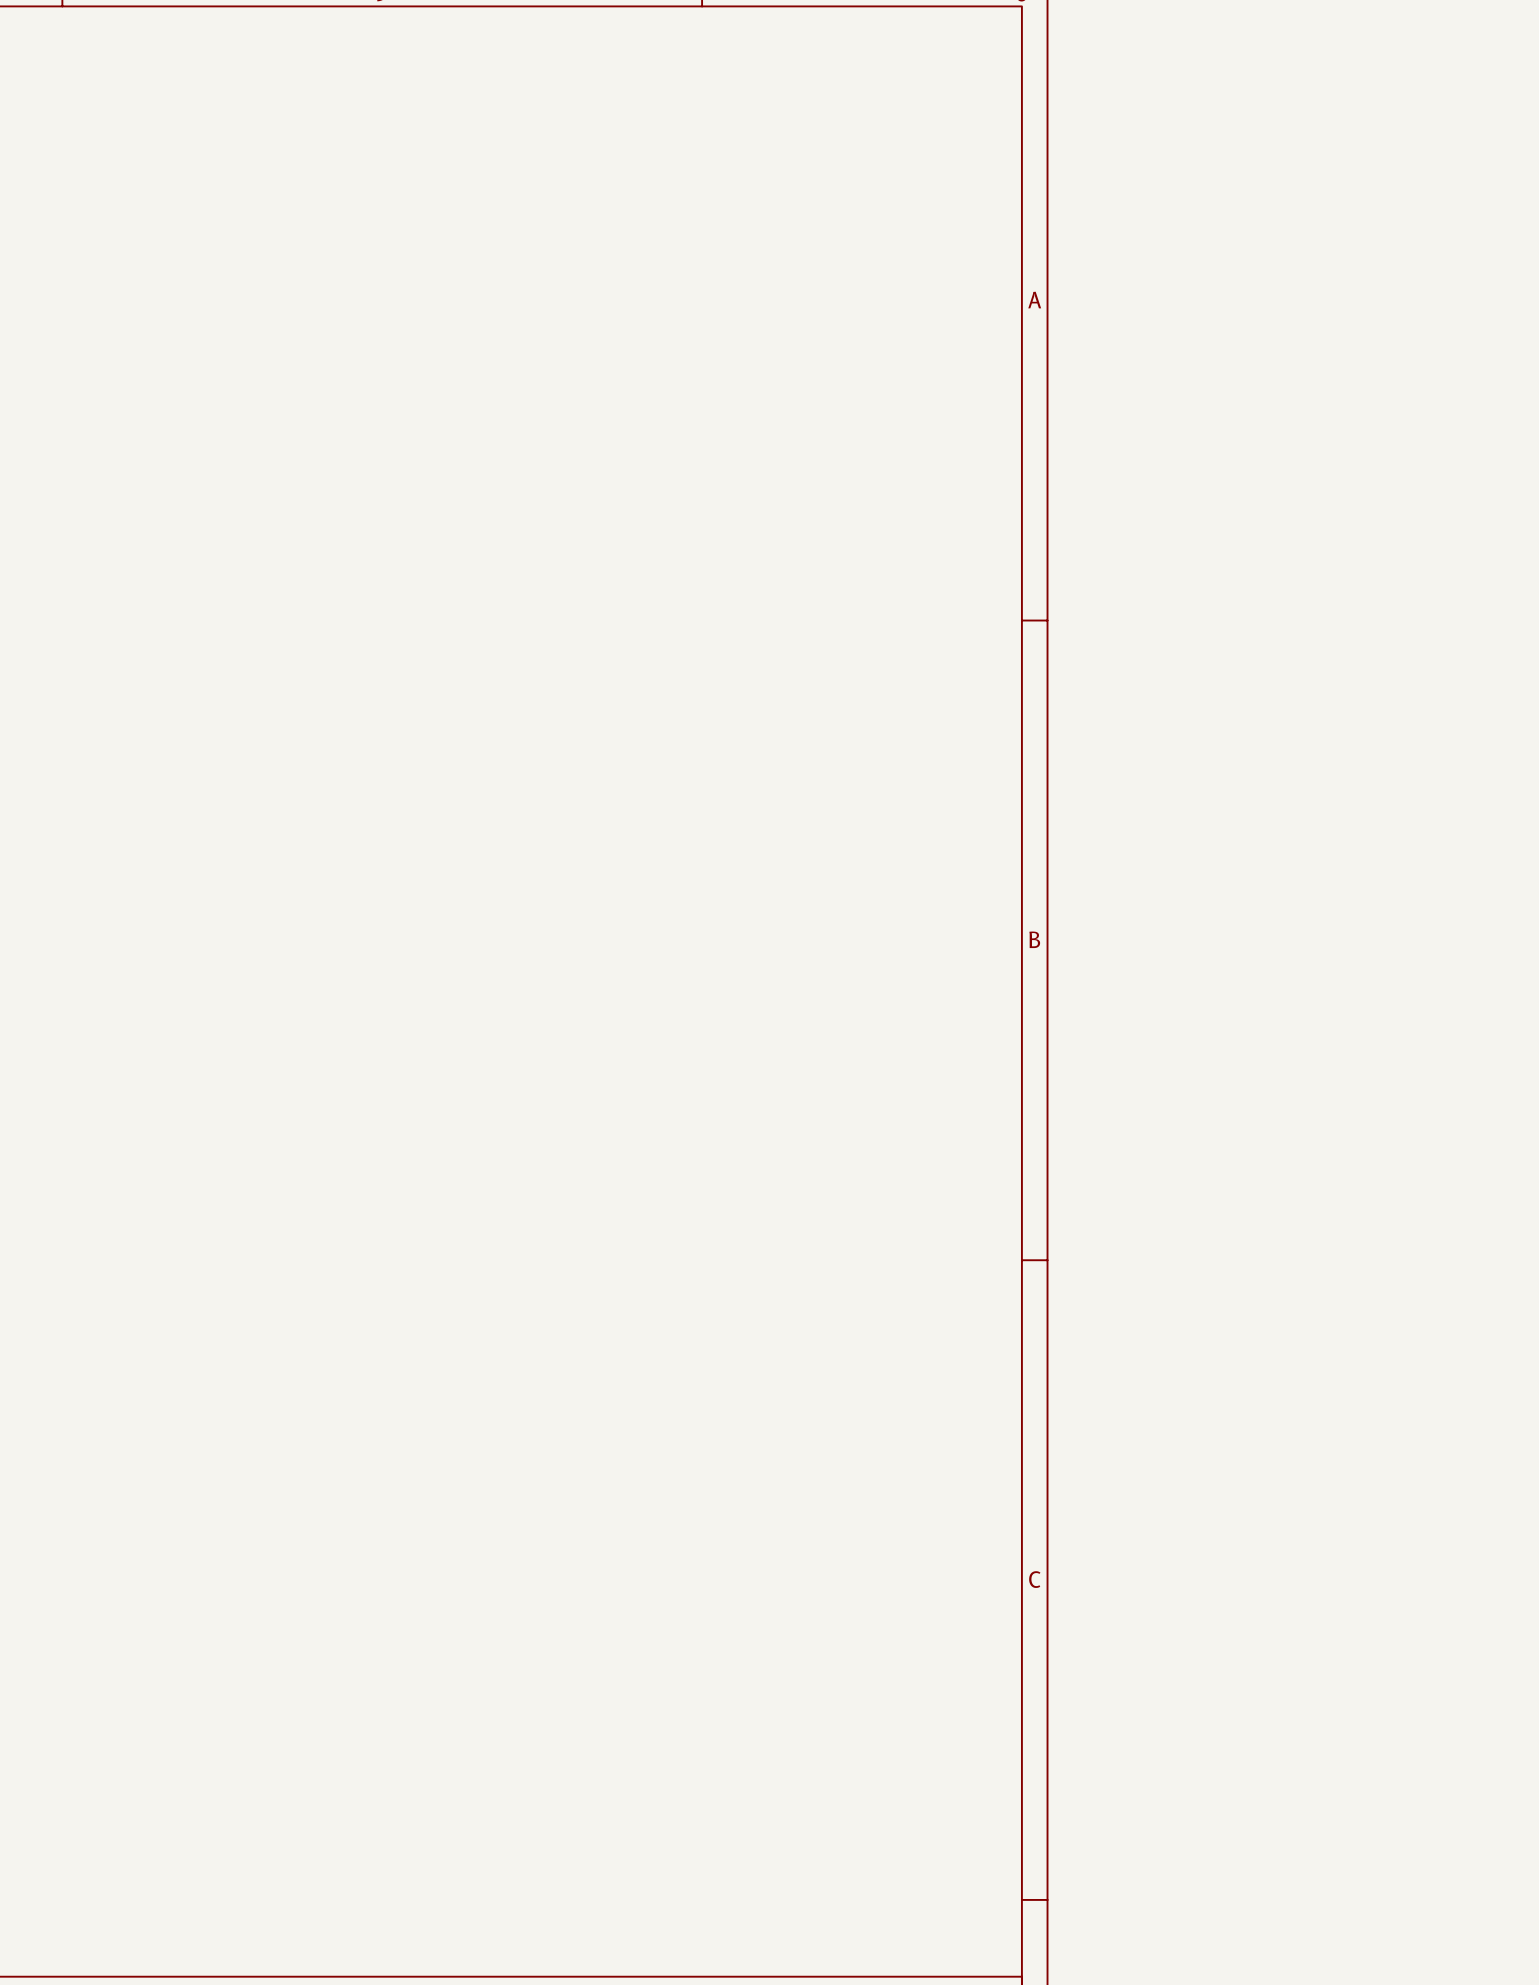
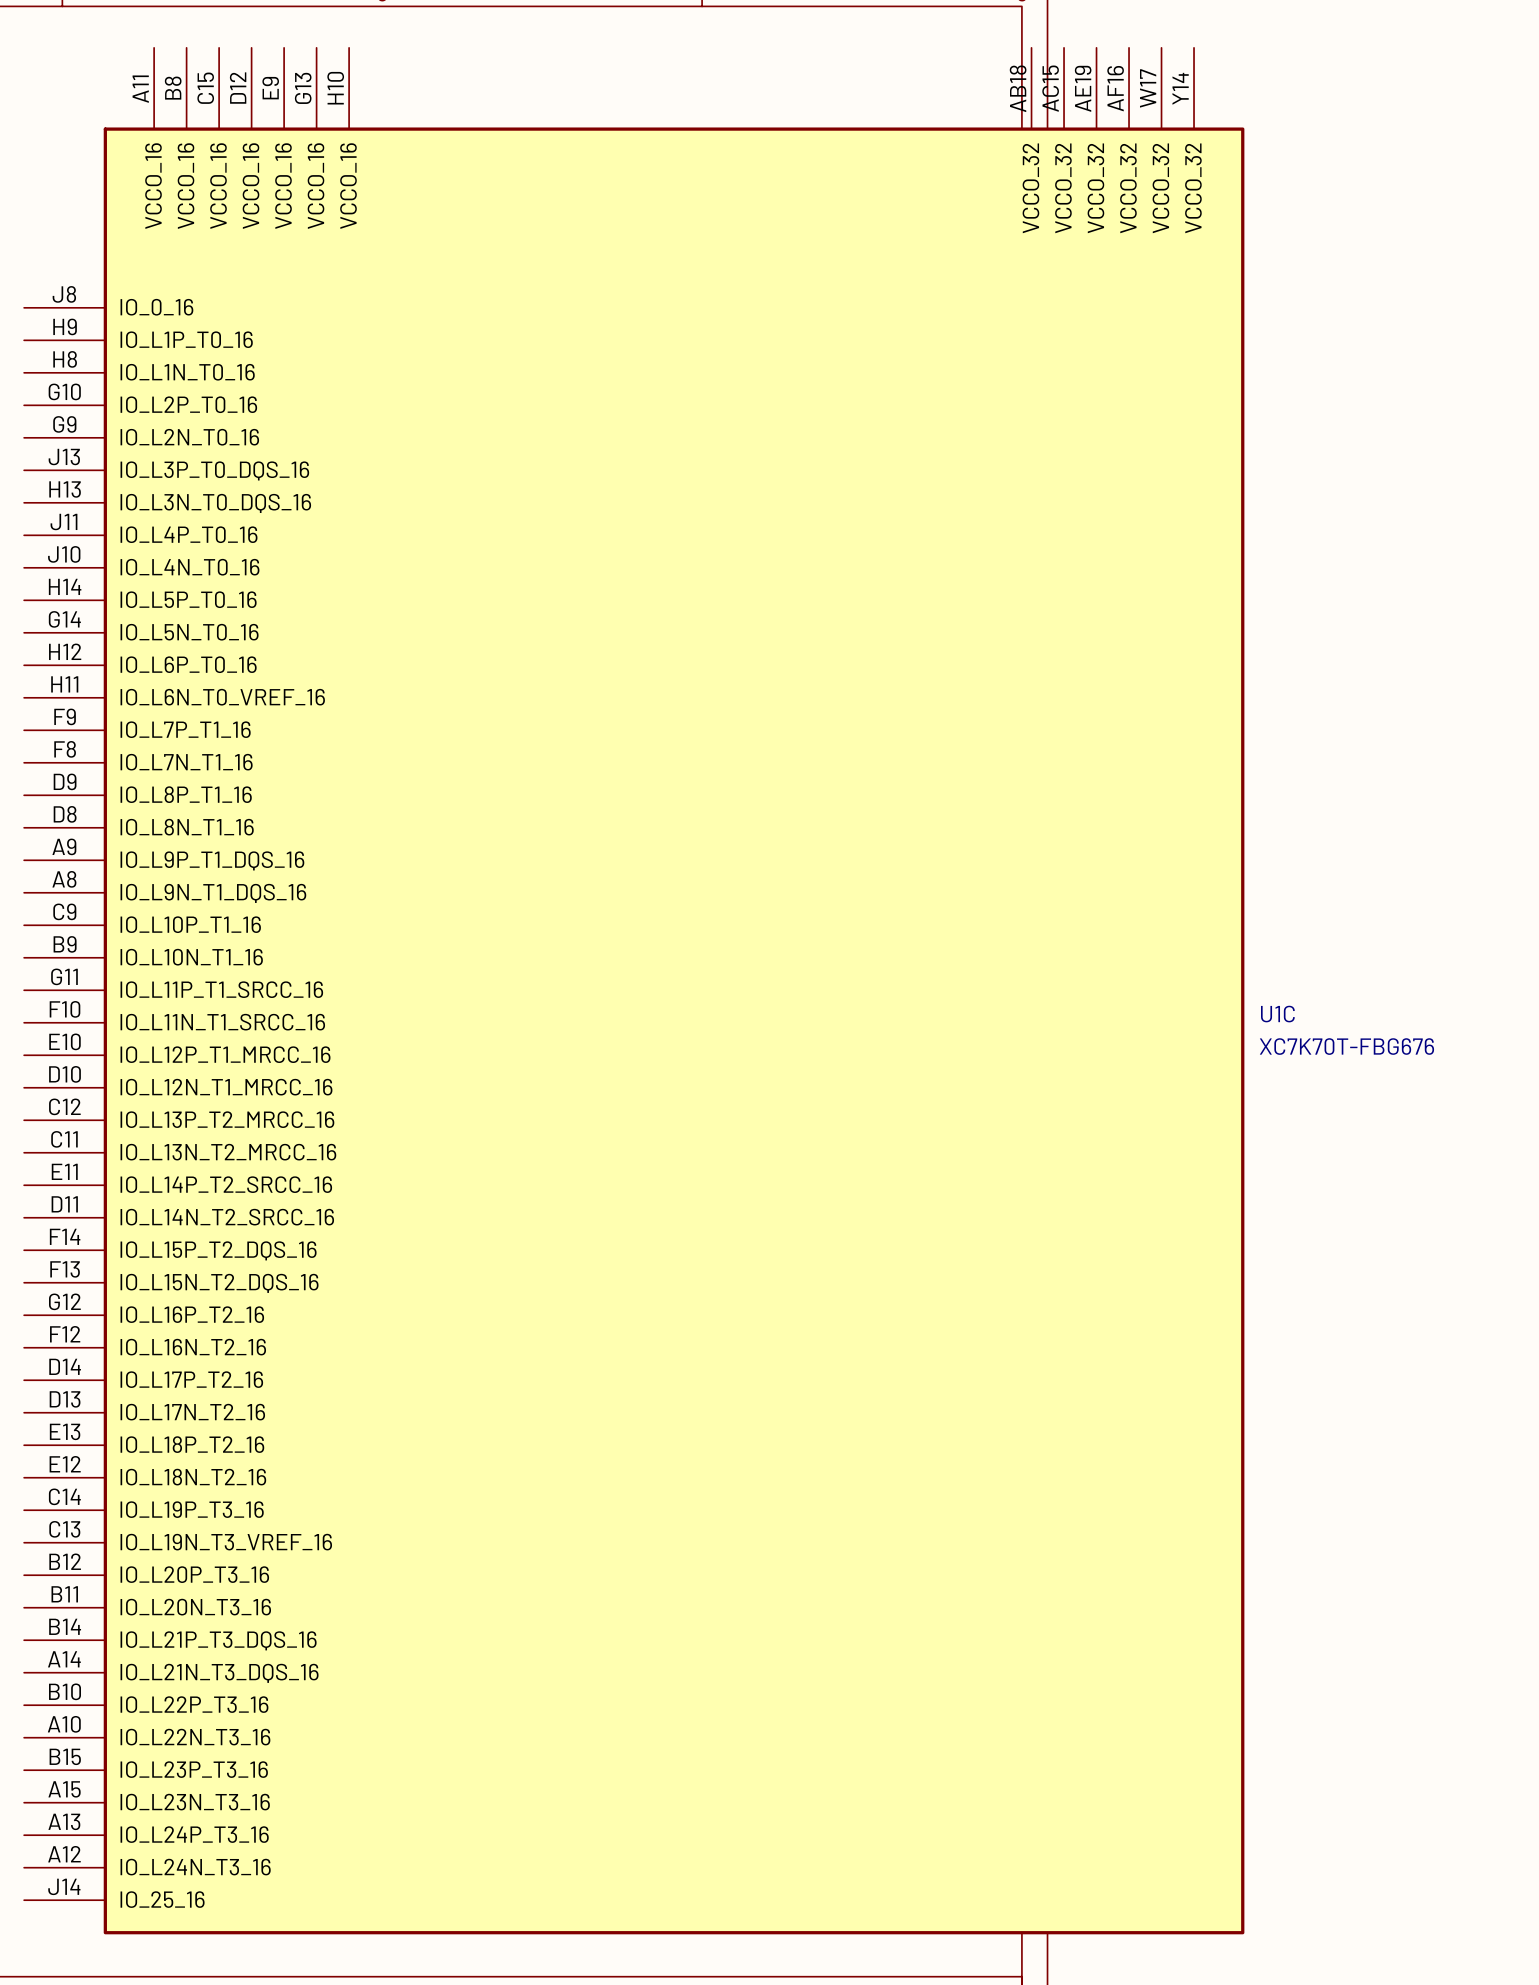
U1C: none -> XC7K70T-FBG676 (634, 991)

